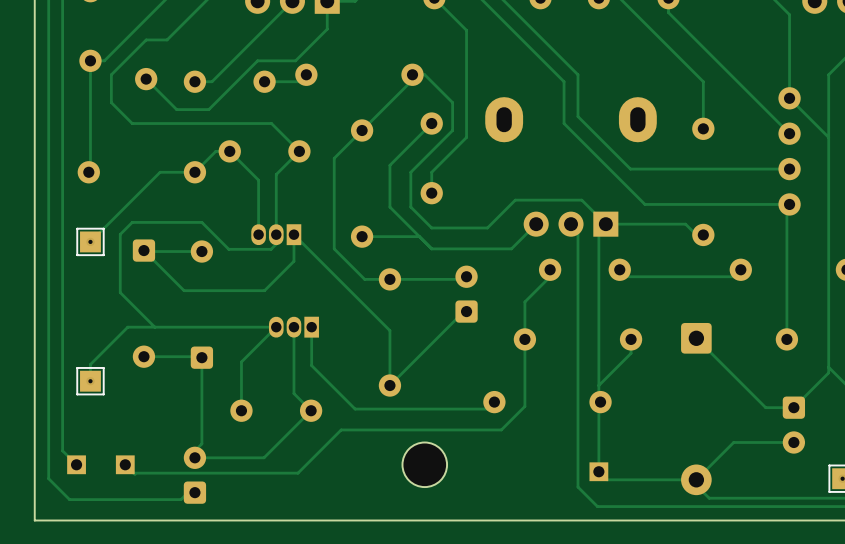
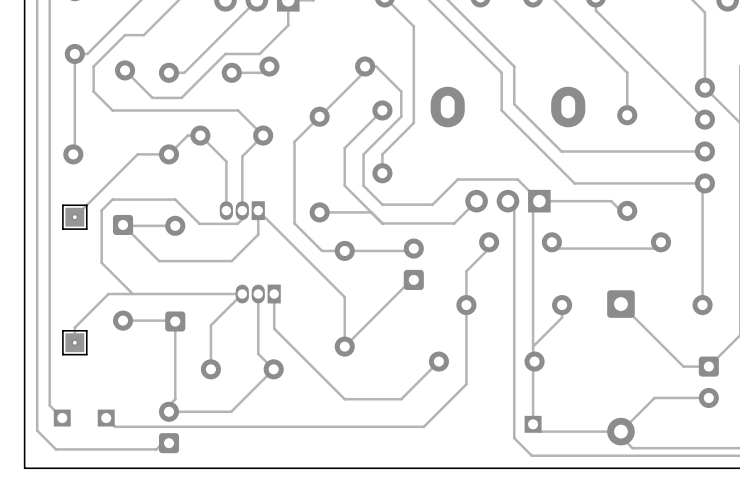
track: (524, 406) (501, 429) (341, 429) (298, 473) (133, 473) -> (466, 365) (466, 384) (423, 426) (115, 426)
track: (487, 409) (355, 409) -> (432, 367) (401, 399) (344, 399) (313, 367)
part: (424, 464) -> none

